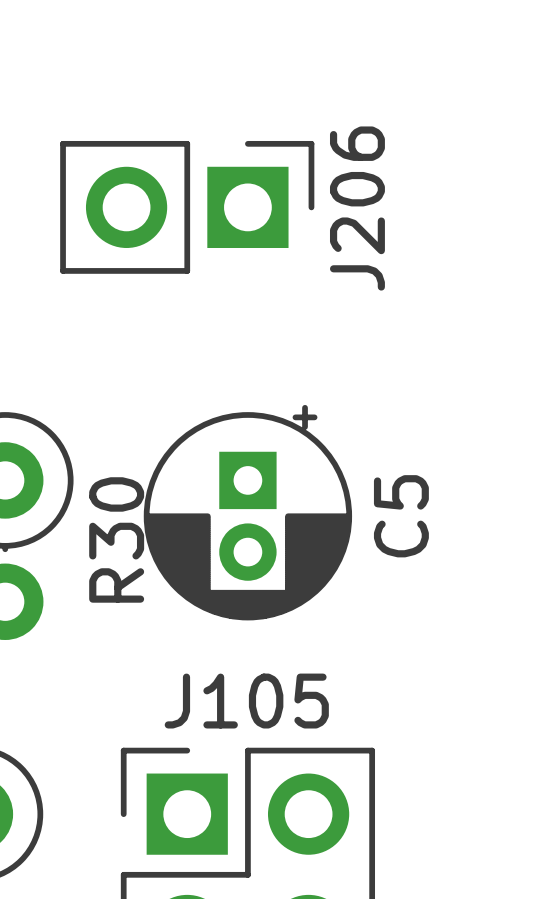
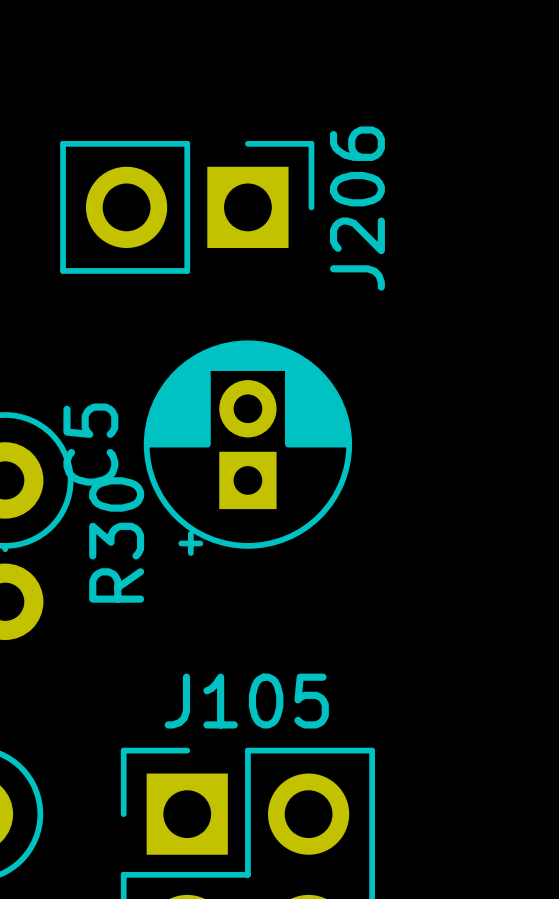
C5 rotation: 0° (247, 512) -> 180° (247, 448)

